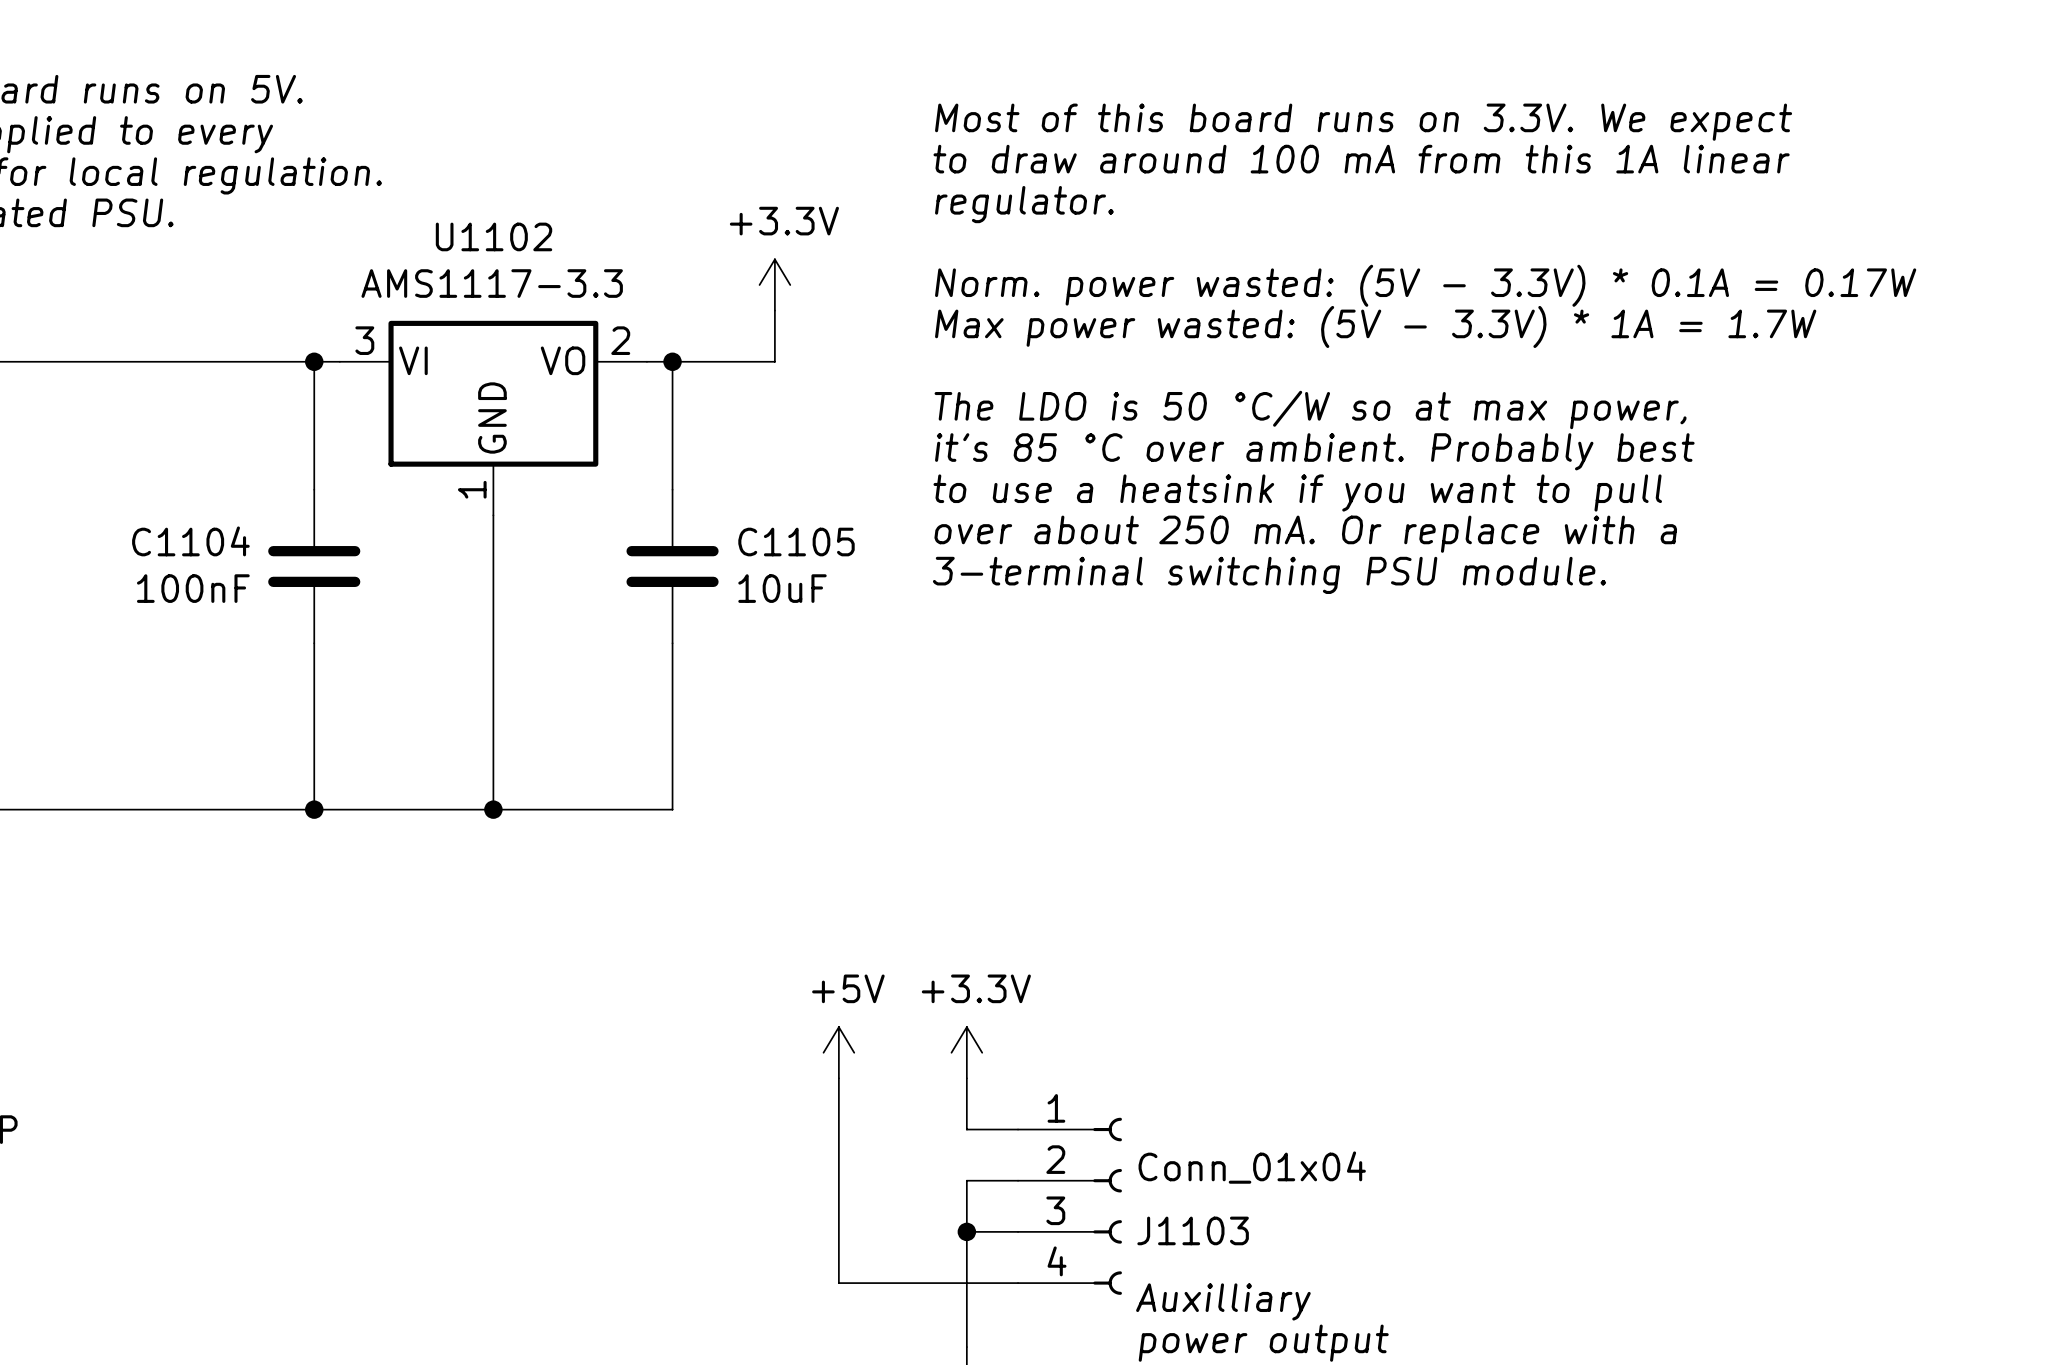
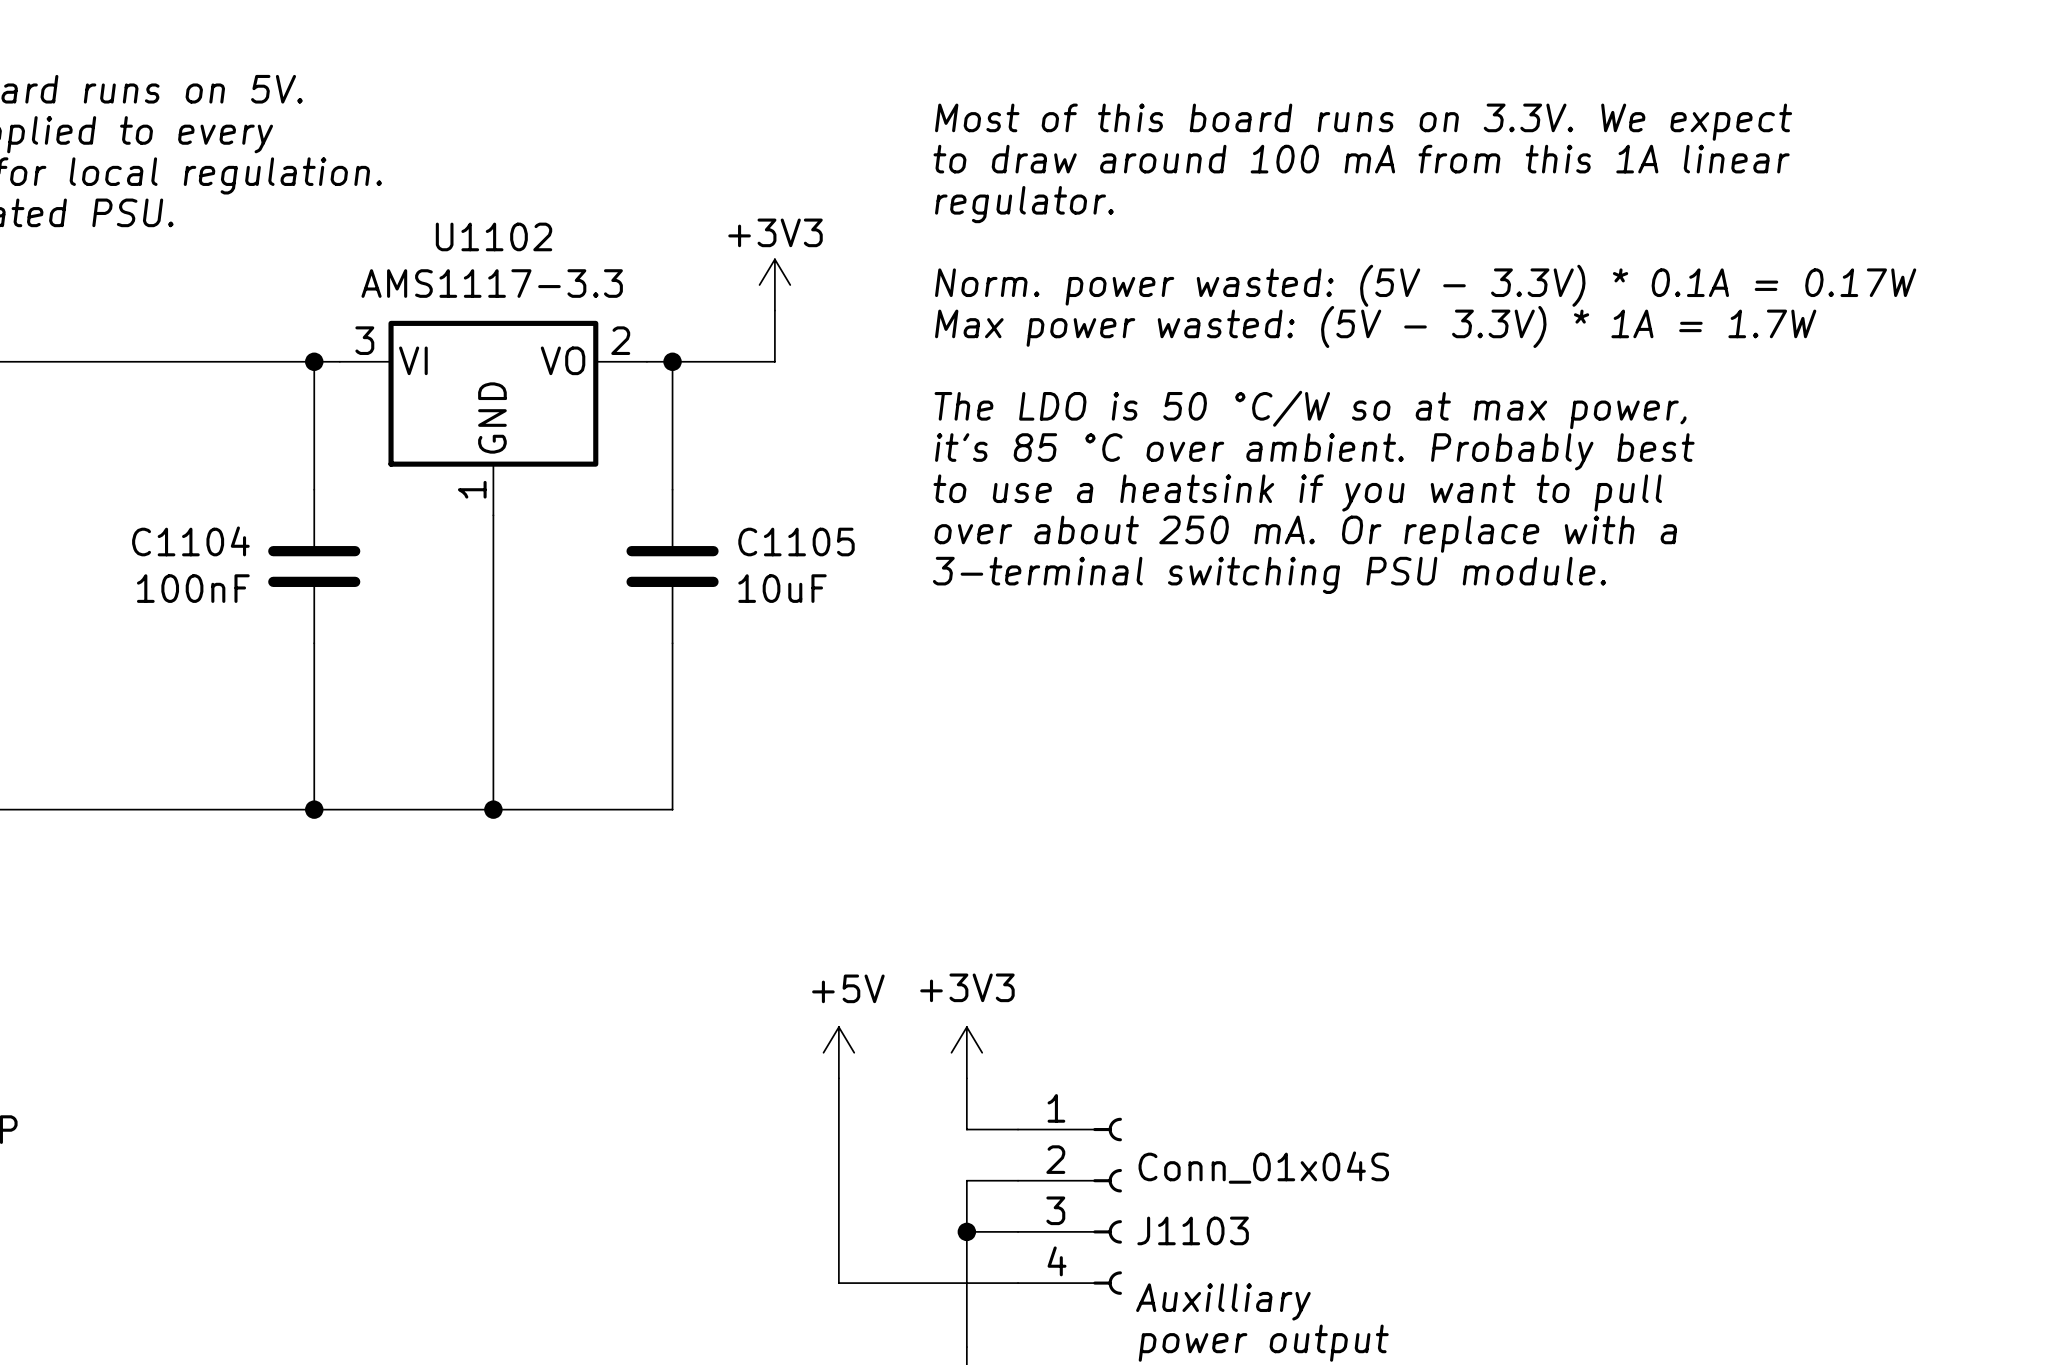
power symbol: +3.3V (774, 285) -> +3V3 (774, 285)
power symbol: +3.3V (966, 1052) -> +3V3 (966, 1052)
J1103 value: Conn_01x04 (1252, 1167) -> Conn_01x04S (1263, 1167)

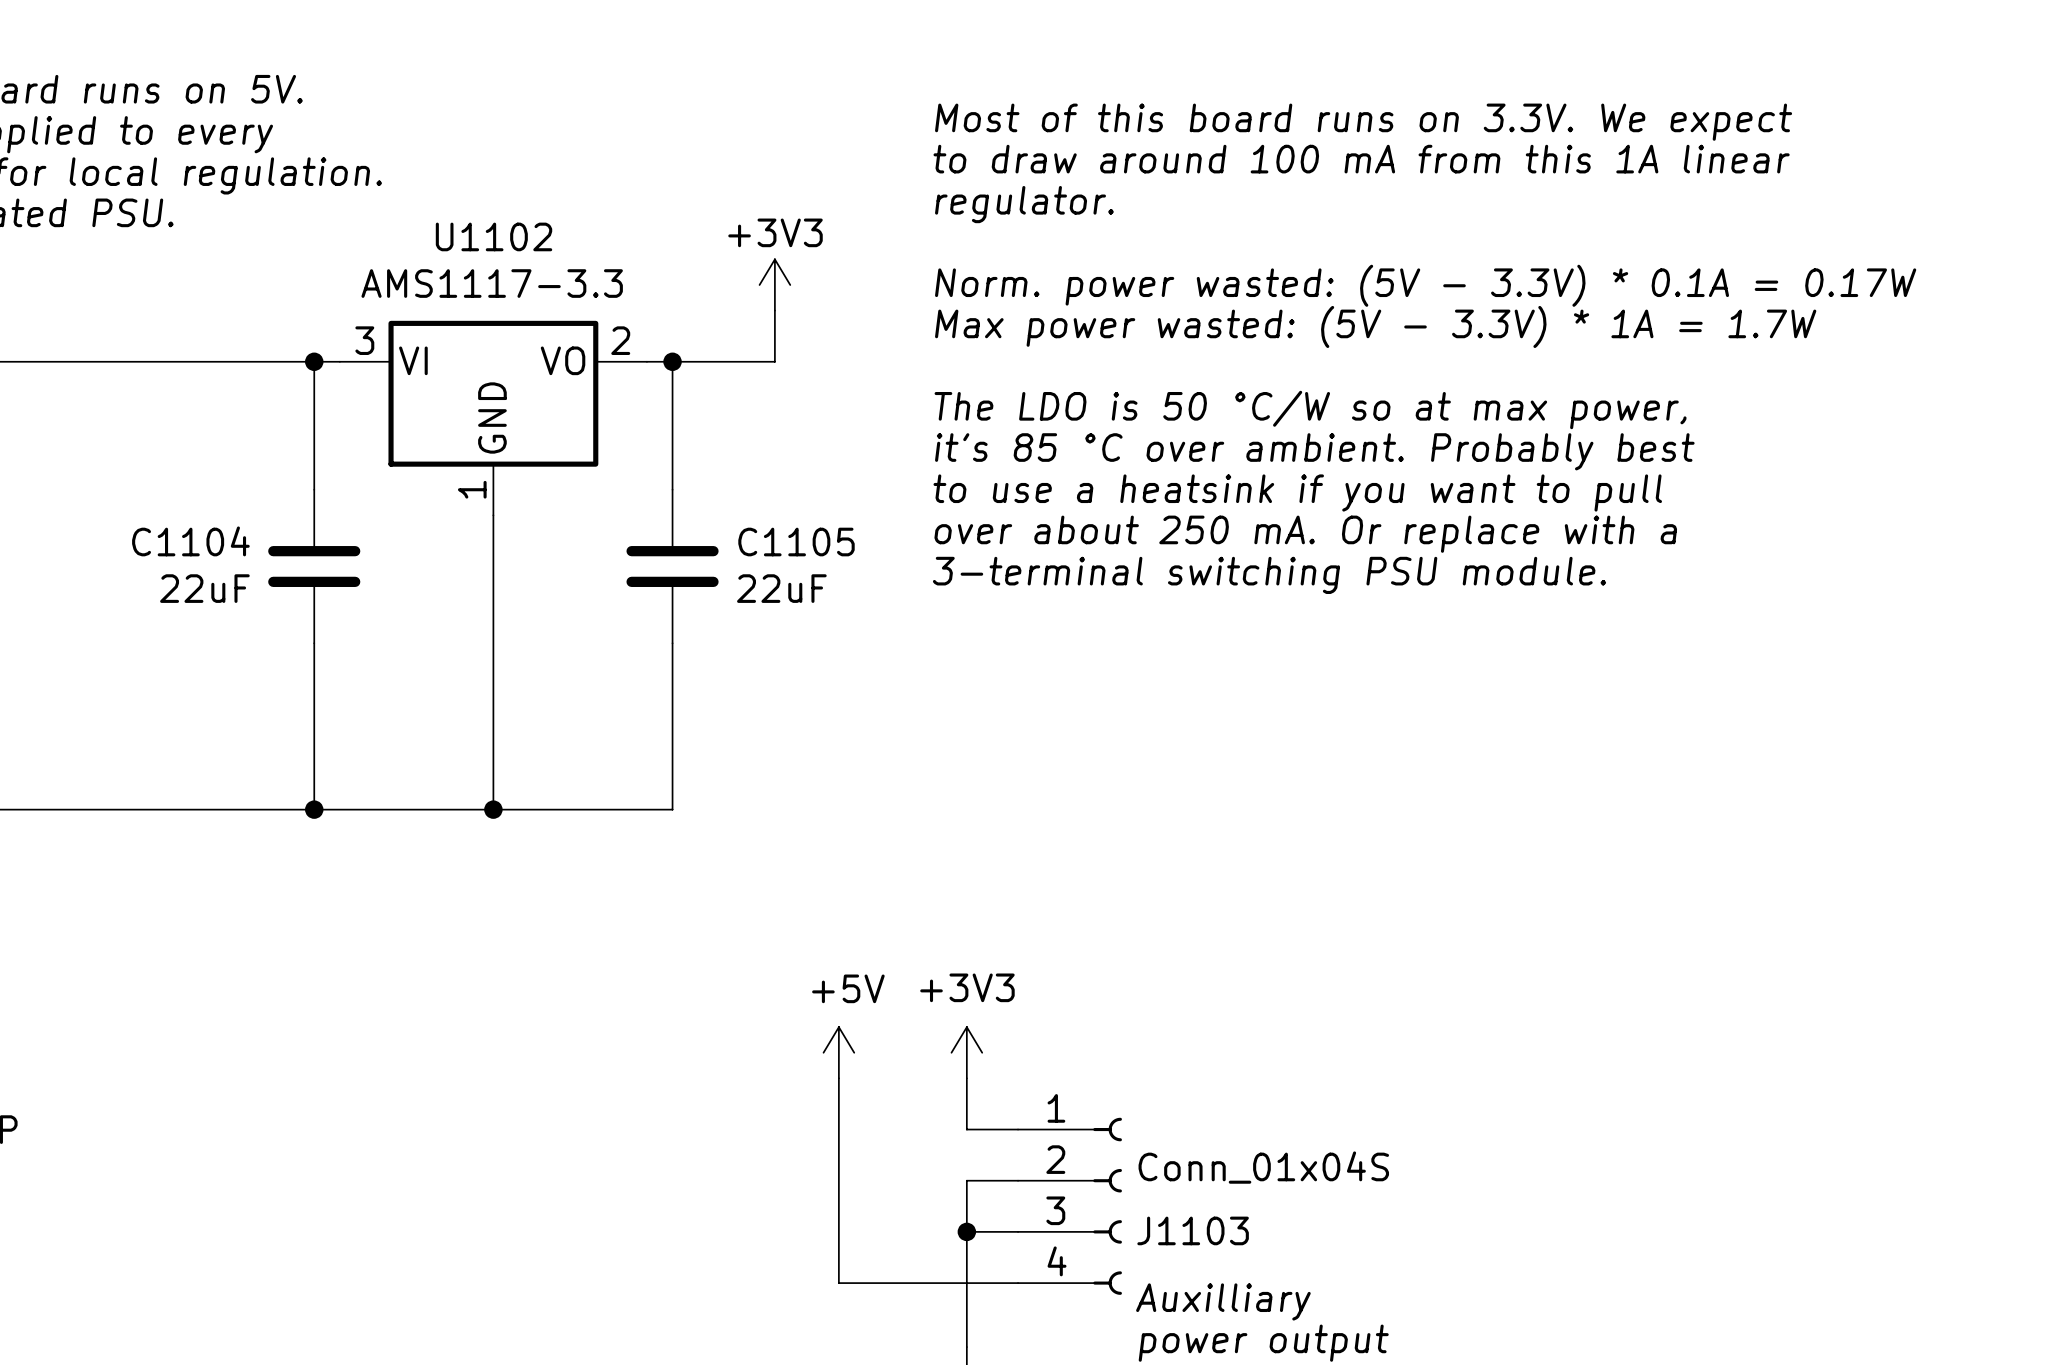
C1104 value: 100nF (193, 588) -> 22uF (204, 588)
C1105 value: 10uF (782, 588) -> 22uF (781, 588)

